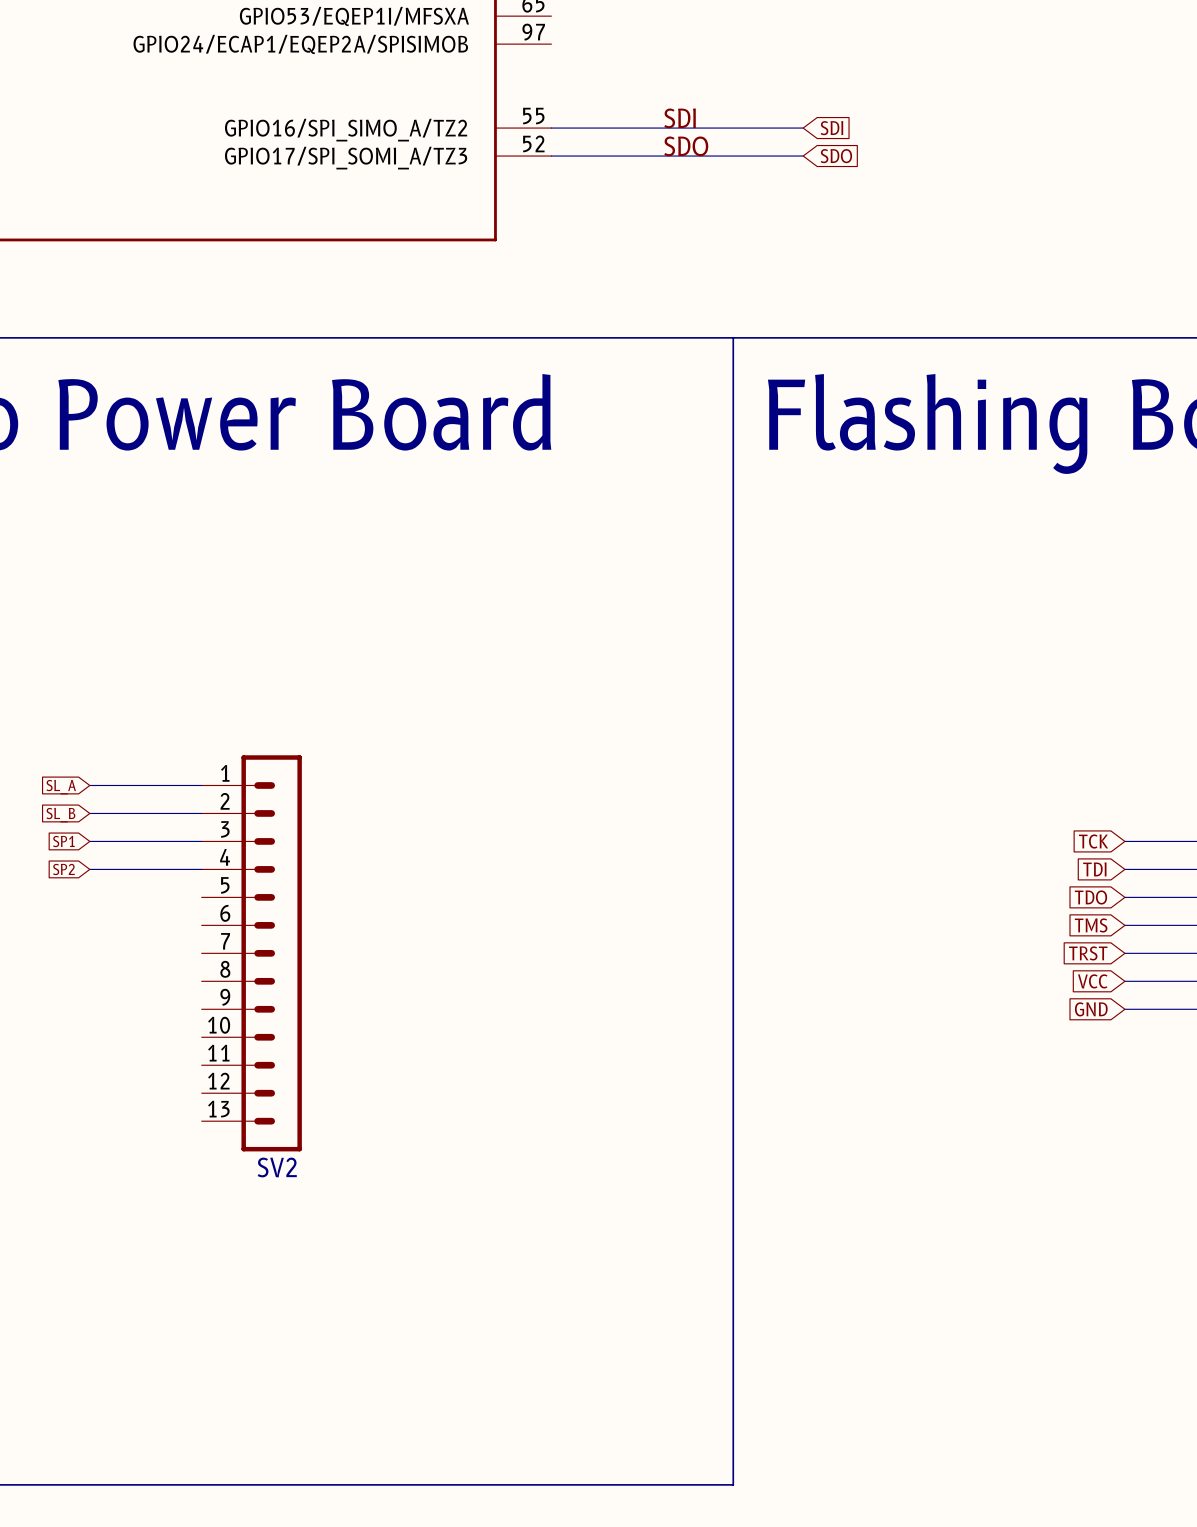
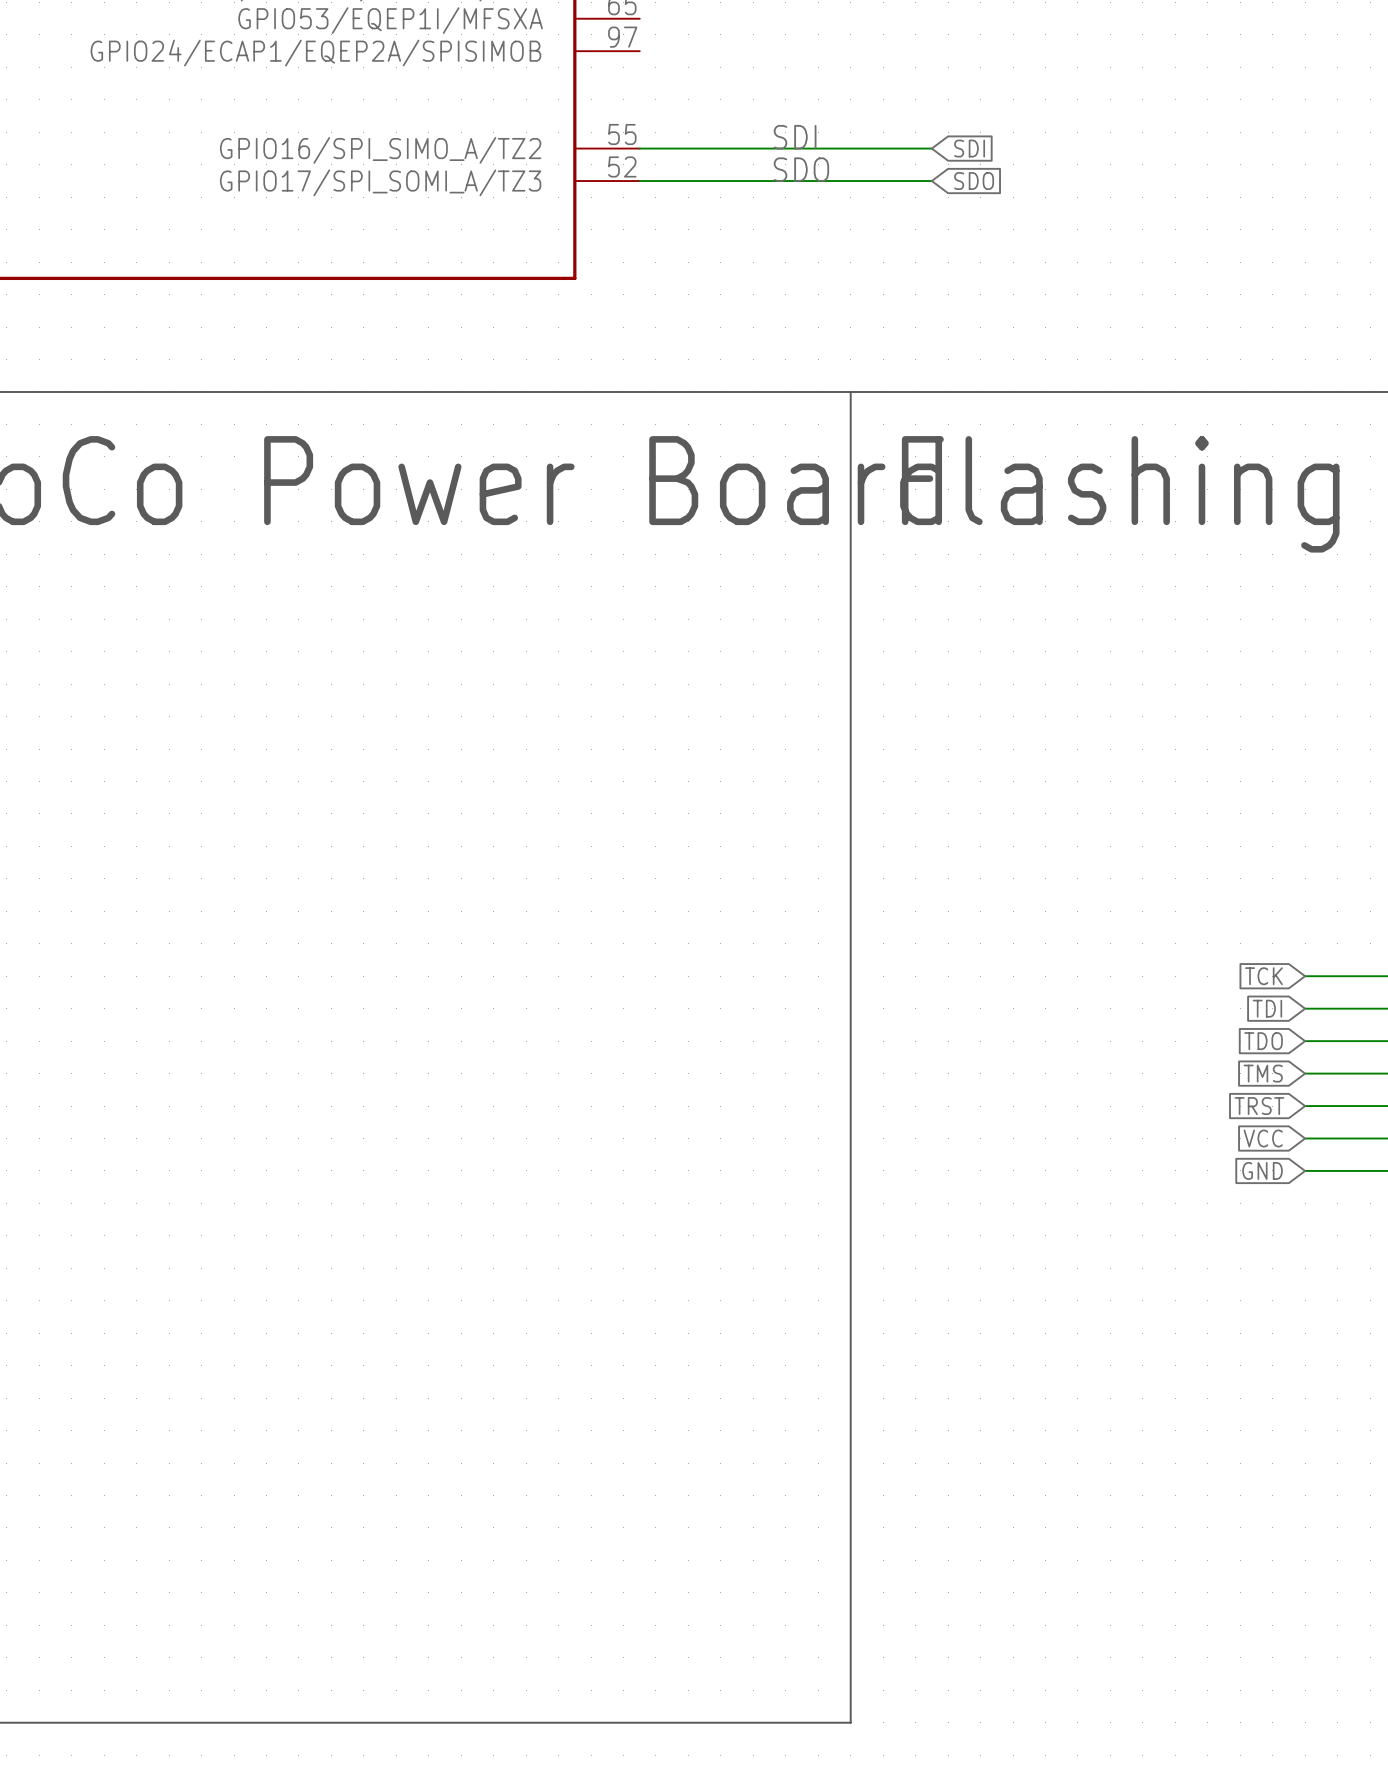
wire: (89, 785) (201, 785) -> none
global label: SL_A (61, 787) -> none
wire: (89, 813) (201, 813) -> none
global label: SL_B (60, 815) -> none
global label: SP1 (63, 841) -> none
wire: (89, 841) (201, 841) -> none
global label: SP2 (63, 869) -> none
wire: (89, 869) (201, 869) -> none
SV2: (251, 953) -> none

